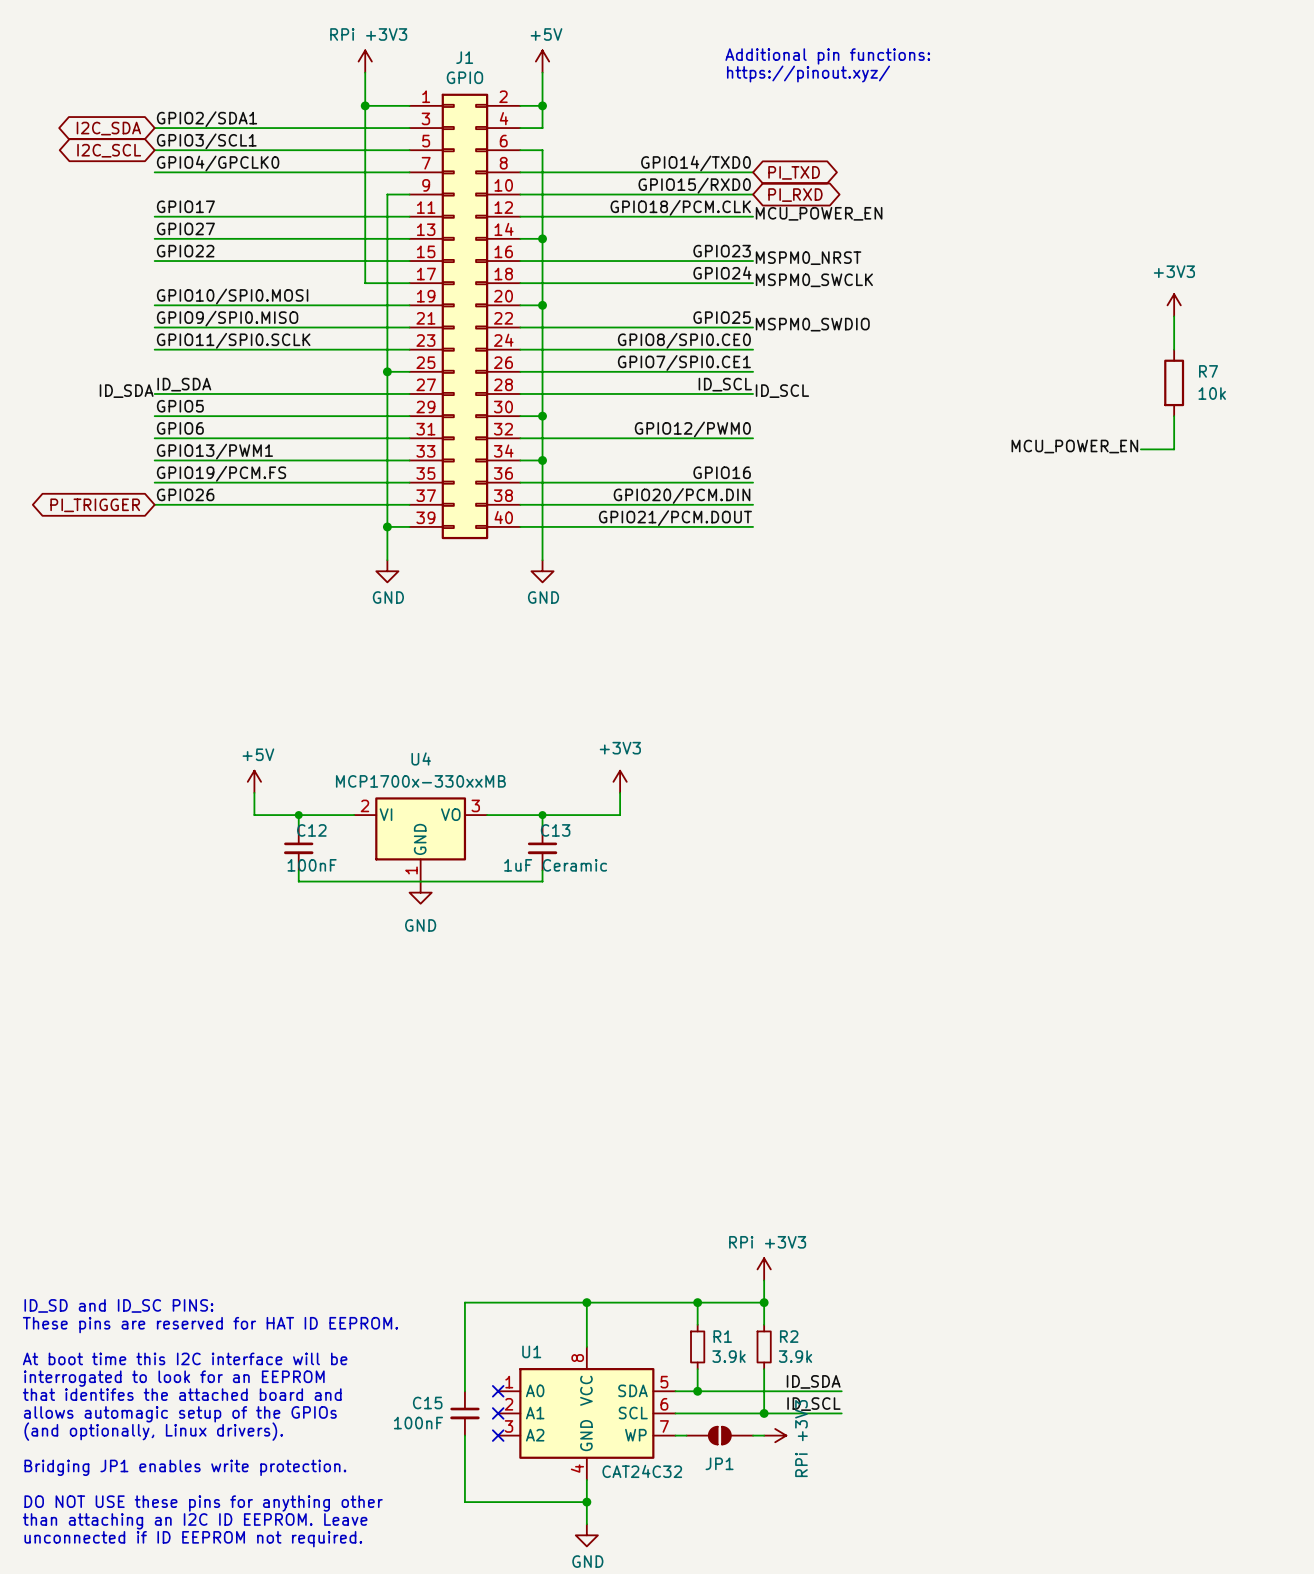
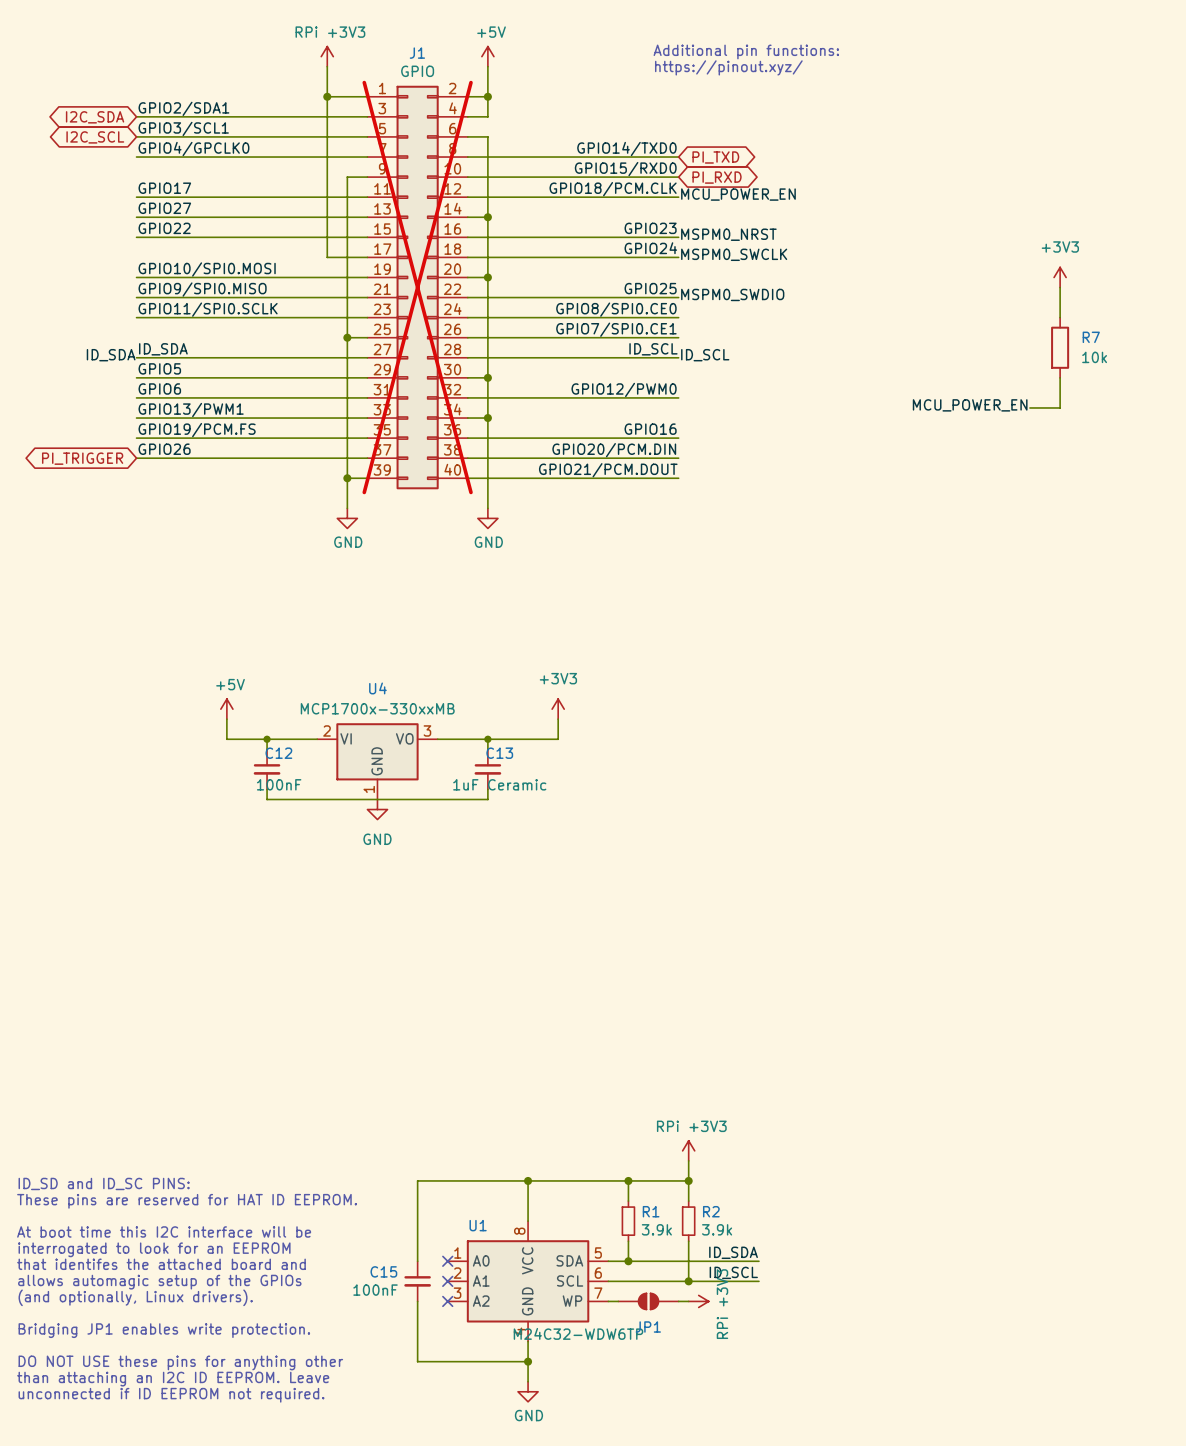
J1 do-not-place cross: none -> (417, 287)
U1 value: CAT24C32 (642, 1471) -> M24C32-WDW6TP (578, 1333)

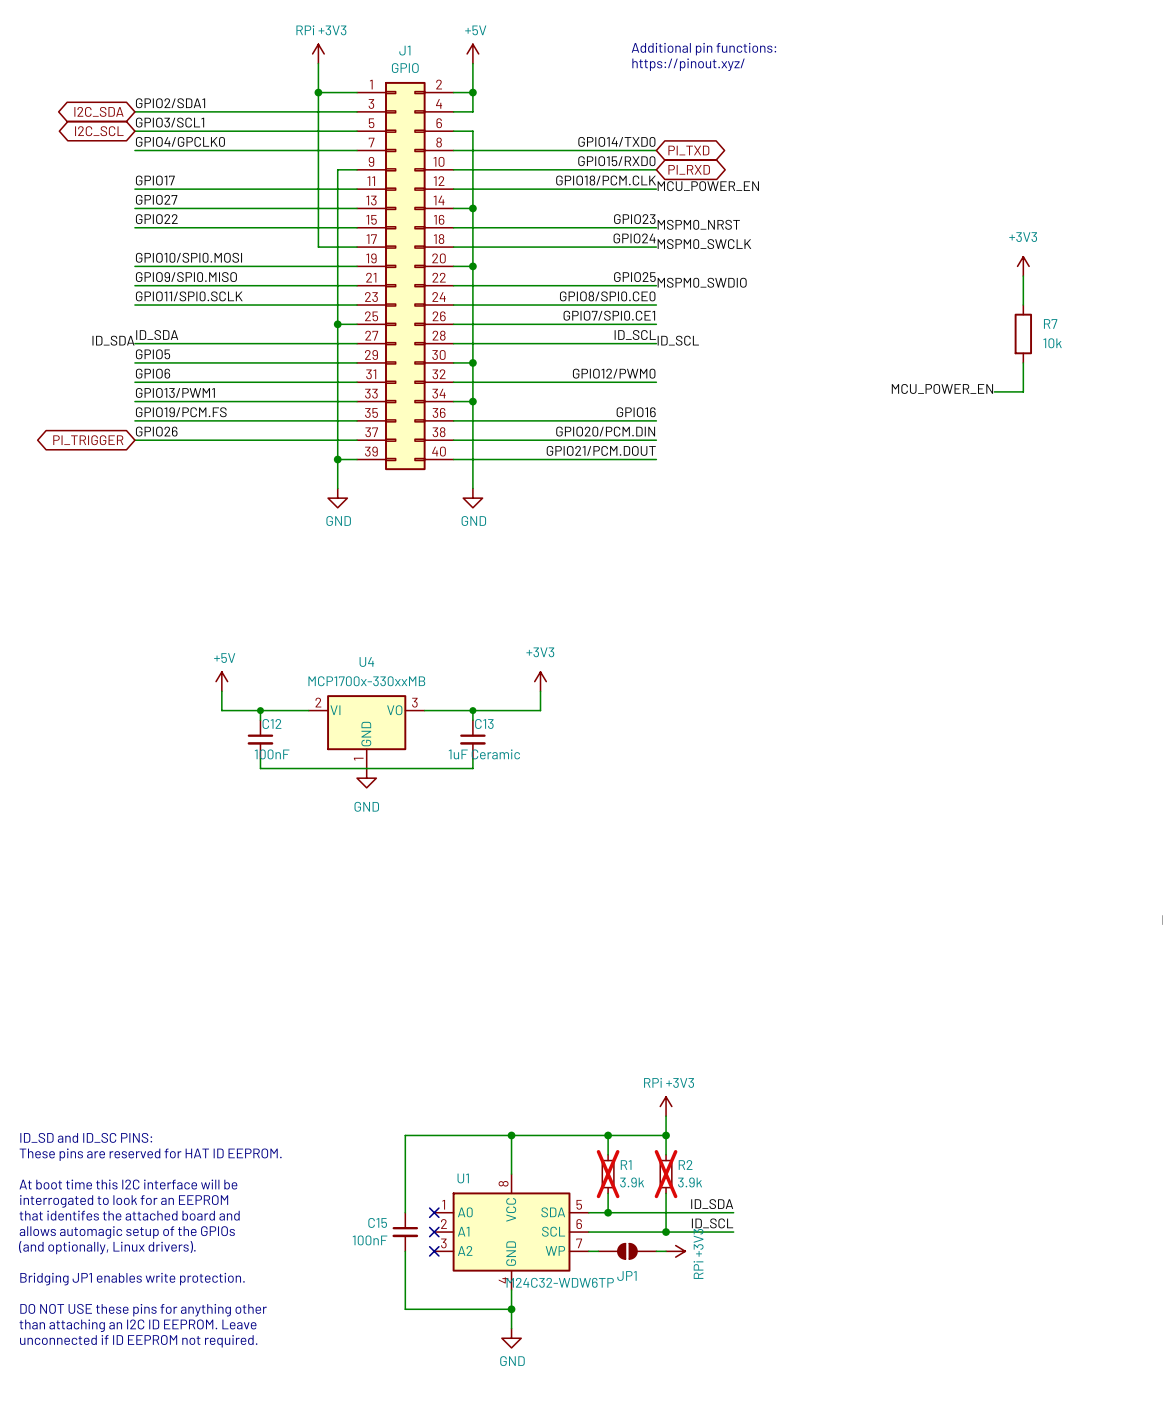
J1 do-not-place cross: (417, 287) -> none
R1 do-not-place cross: none -> (608, 1174)
R2 do-not-place cross: none -> (666, 1174)

